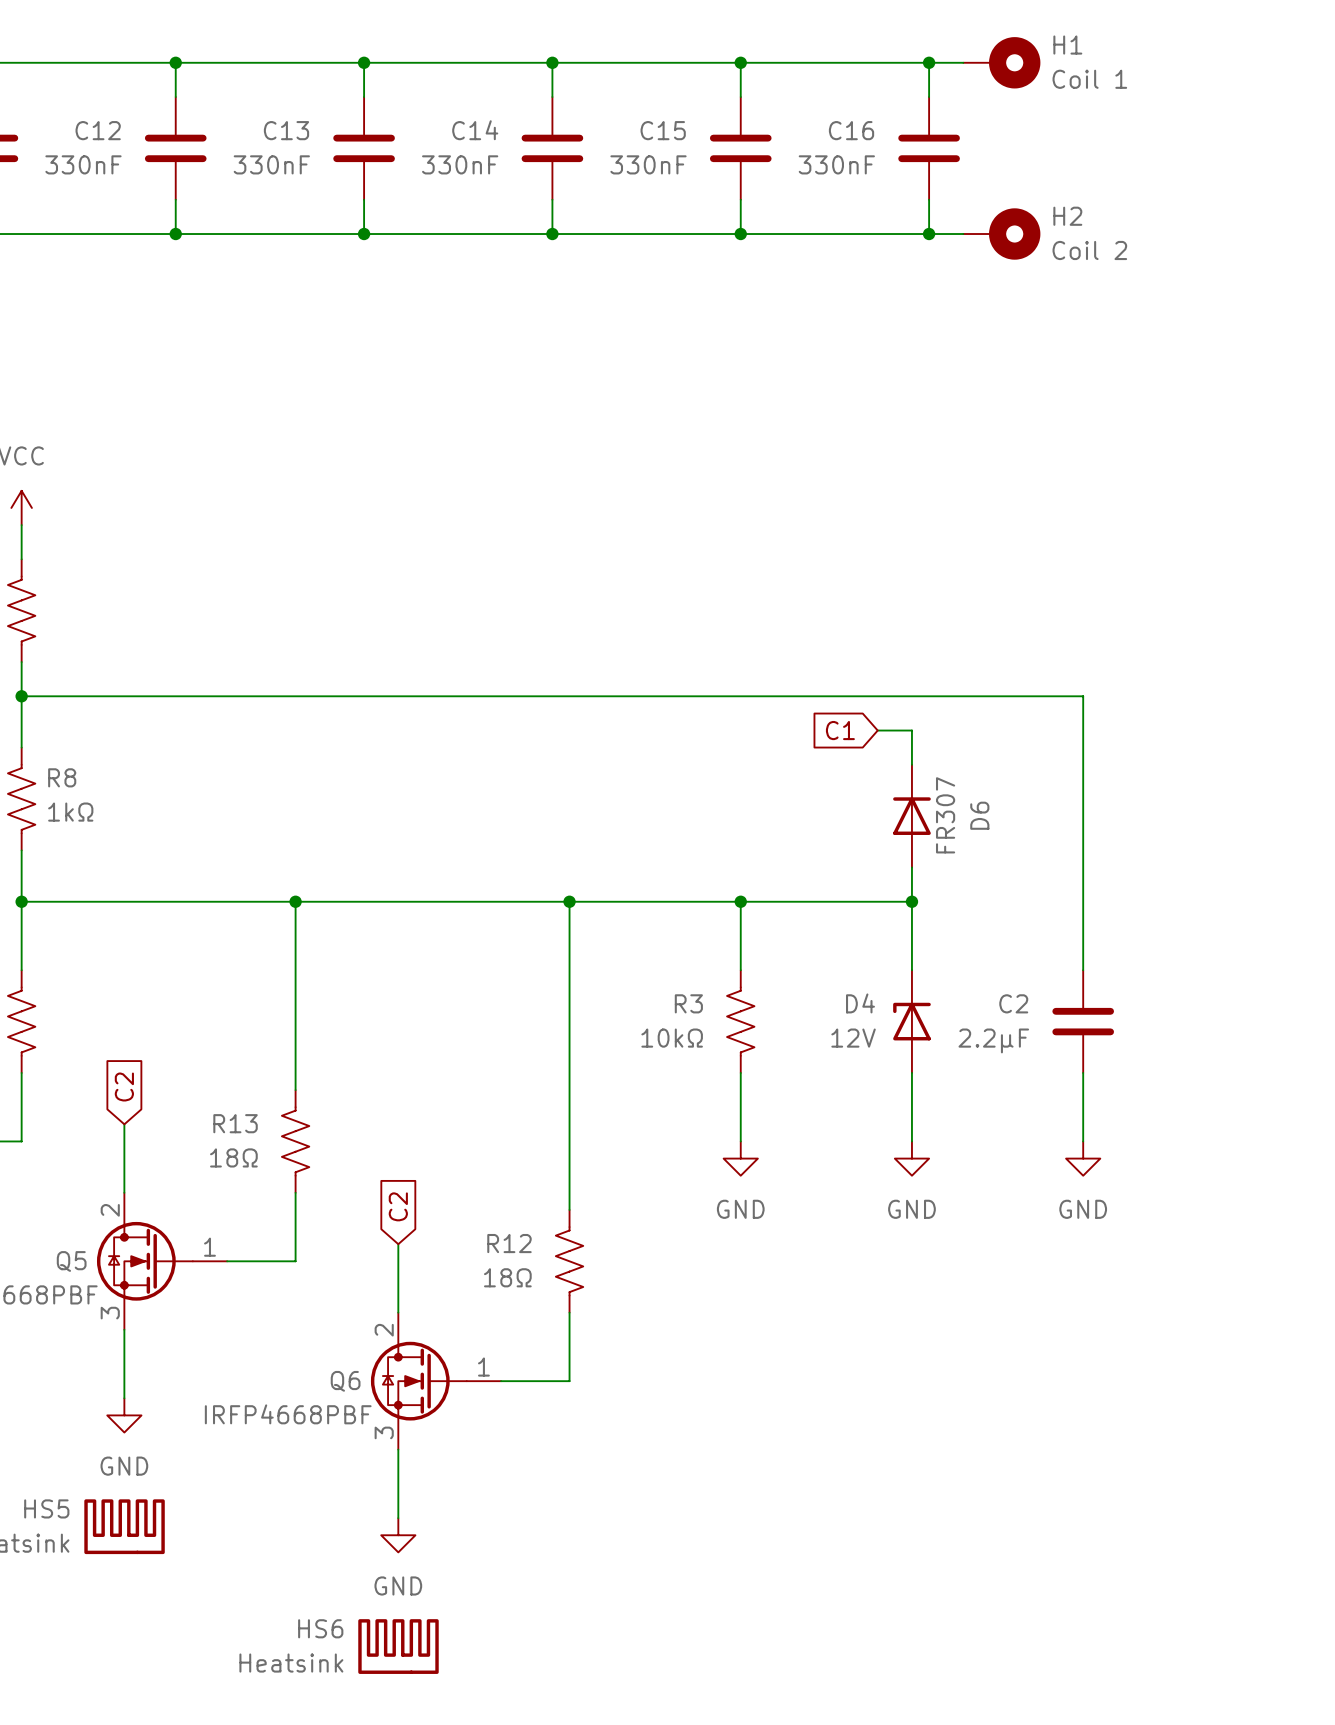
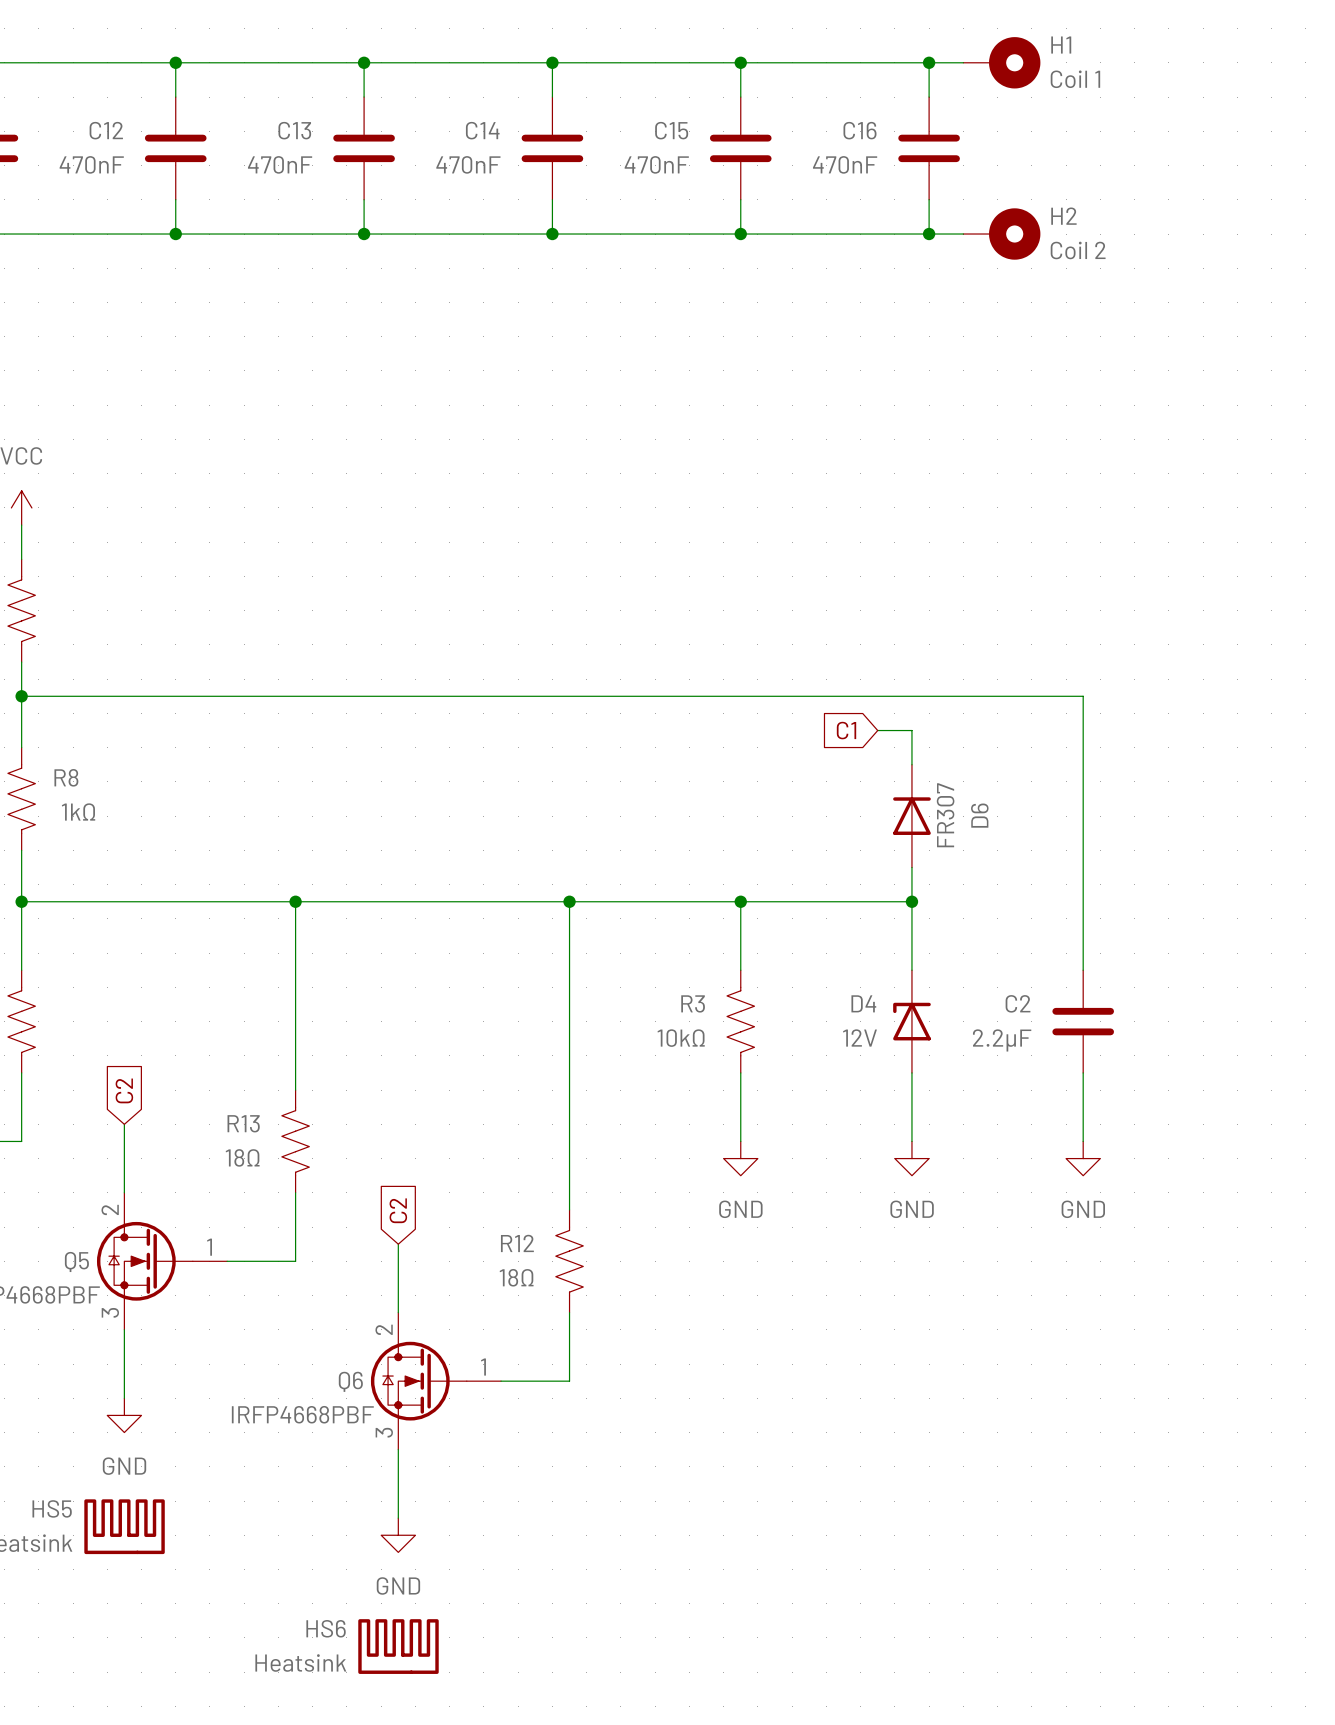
C12 value: 330nF (83, 164) -> 470nF (91, 164)
C13 value: 330nF (271, 164) -> 470nF (280, 164)
C14 value: 330nF (460, 164) -> 470nF (468, 164)
C15 value: 330nF (648, 164) -> 470nF (656, 164)
C16 value: 330nF (836, 164) -> 470nF (845, 164)

